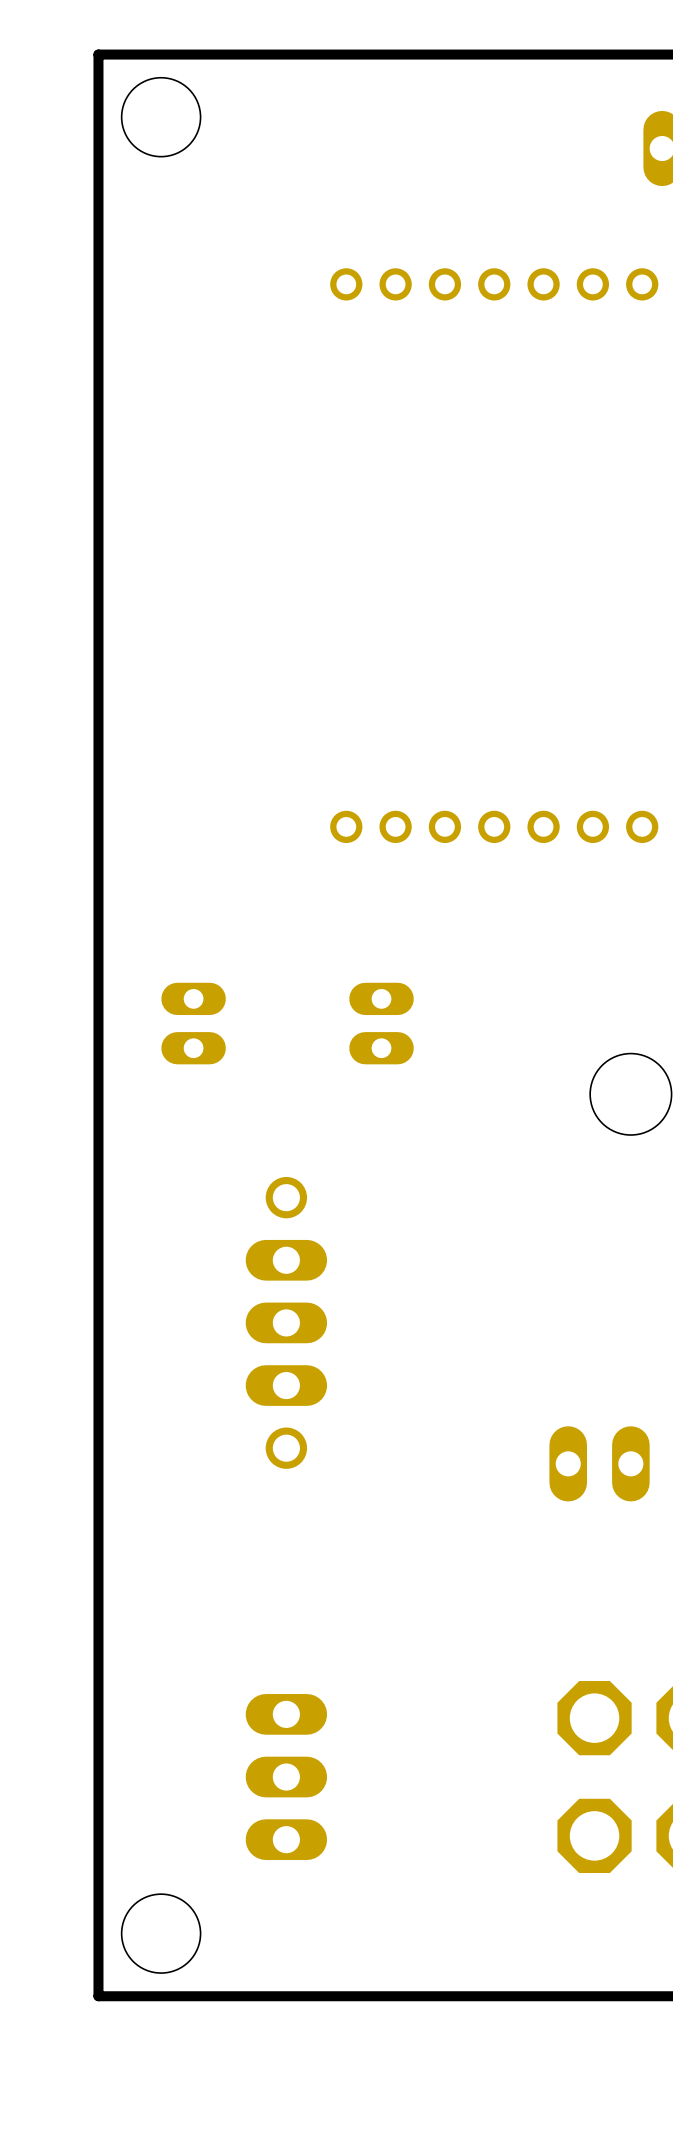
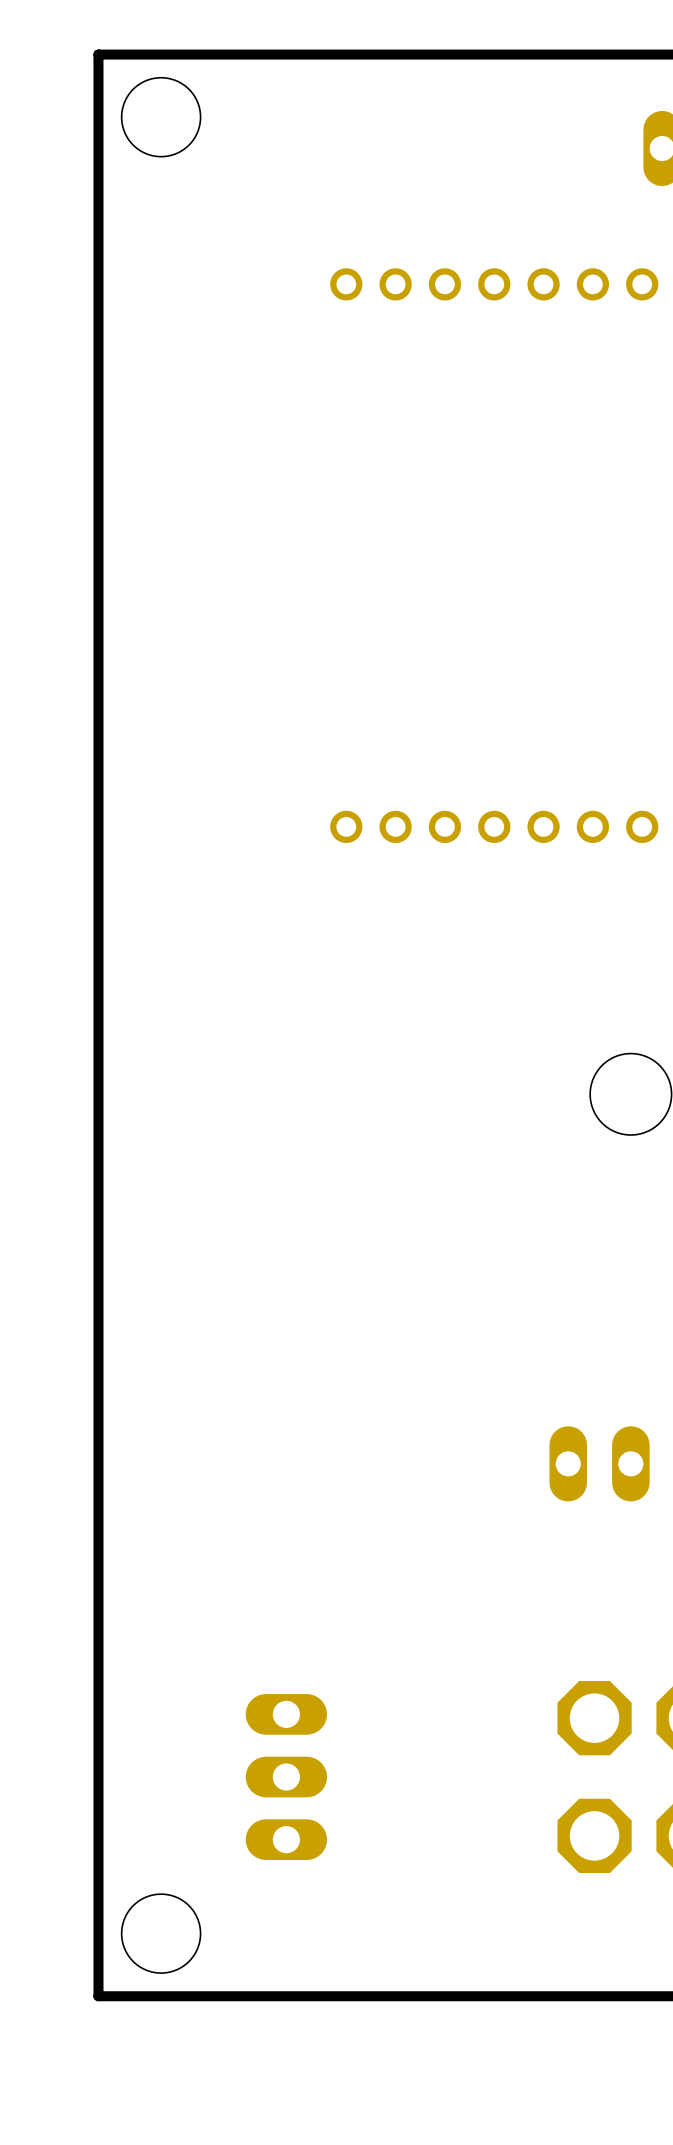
part: (193, 1023) -> none
part: (381, 1023) -> none
part: (286, 1322) -> none

